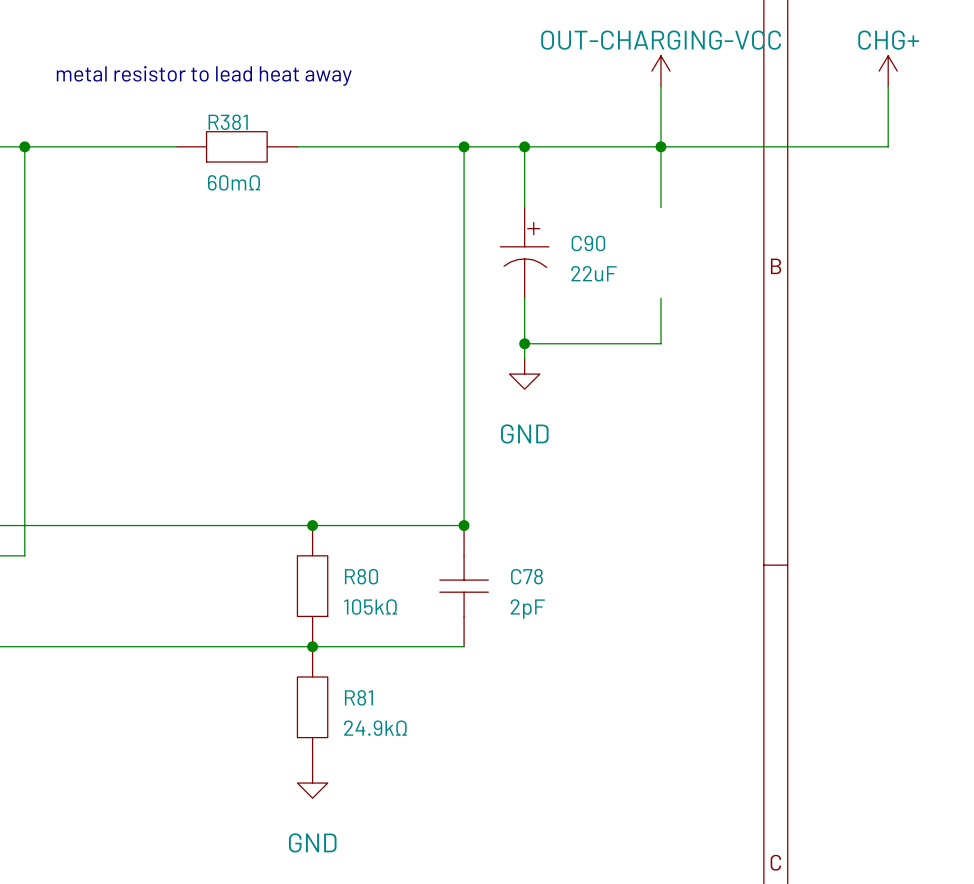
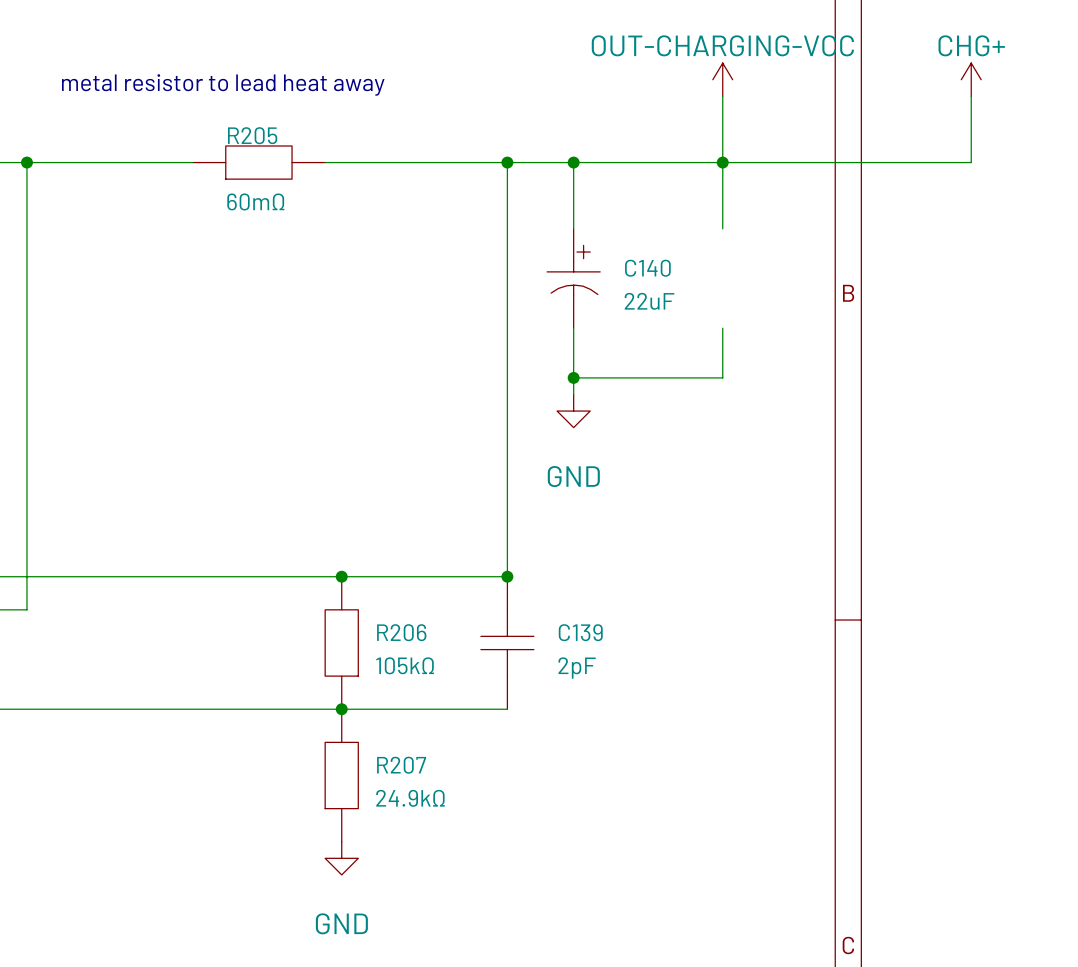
R381 name: R381 (228, 122) -> R205 (252, 135)
C90 name: C90 (588, 243) -> C140 (647, 268)
R80 name: R80 (361, 576) -> R206 (401, 632)
C78 name: C78 (526, 576) -> C139 (580, 632)
R81 name: R81 (358, 697) -> R207 (401, 765)

